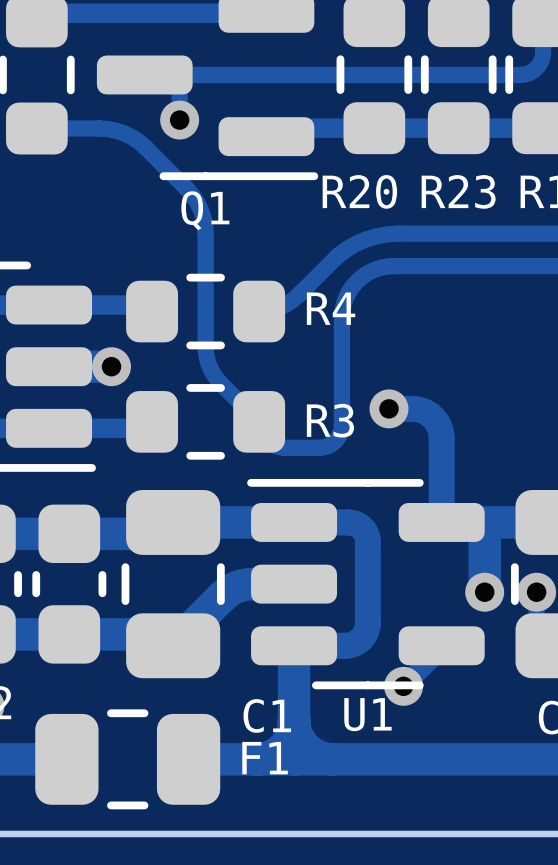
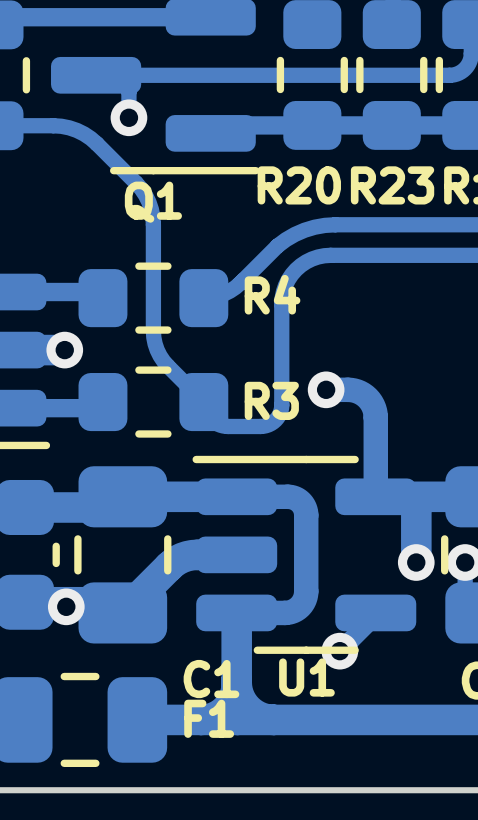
via: none -> (66, 606)

